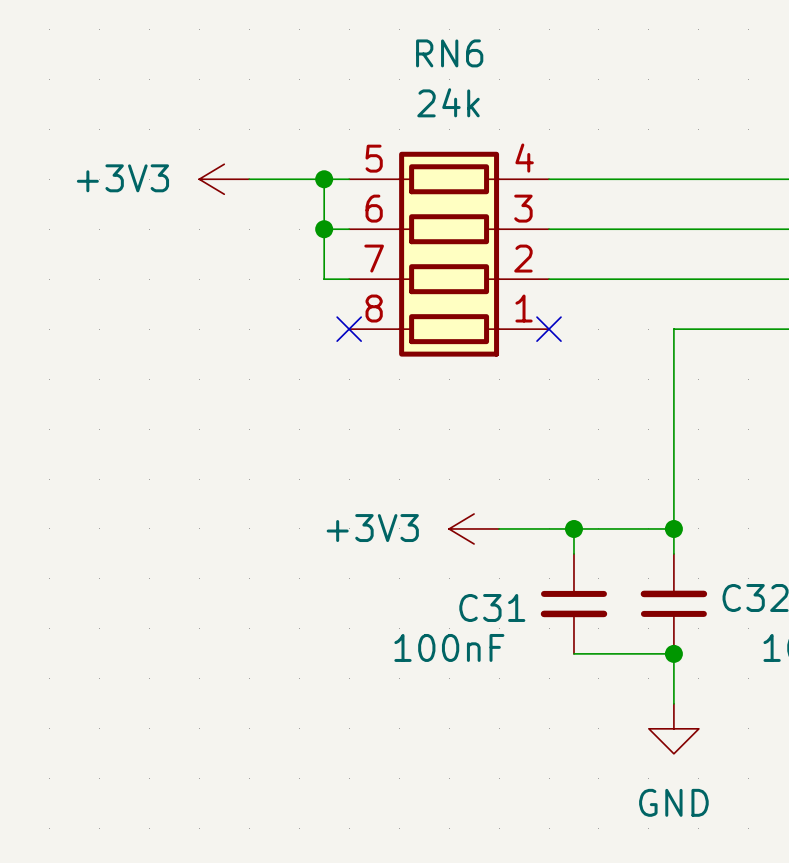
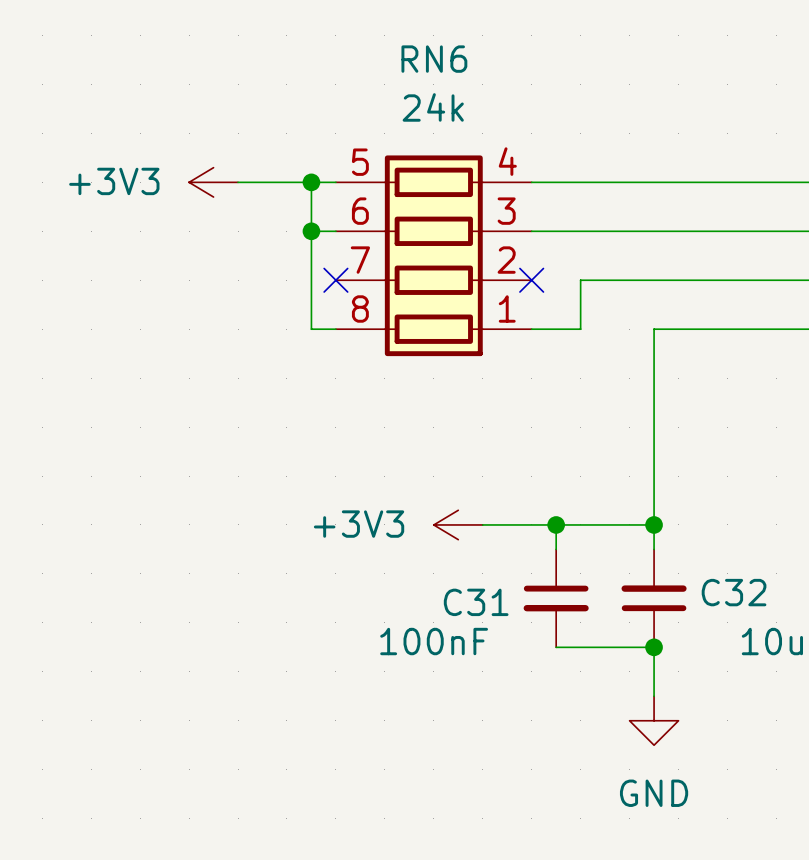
wire: (324, 279) (349, 279) -> (311, 280) (311, 329) (335, 329)
wire: (549, 279) (598, 279) -> (531, 329) (580, 329) (580, 280)
no-connect mark position: (349, 329) -> (335, 280)
no-connect mark position: (549, 329) -> (531, 280)

